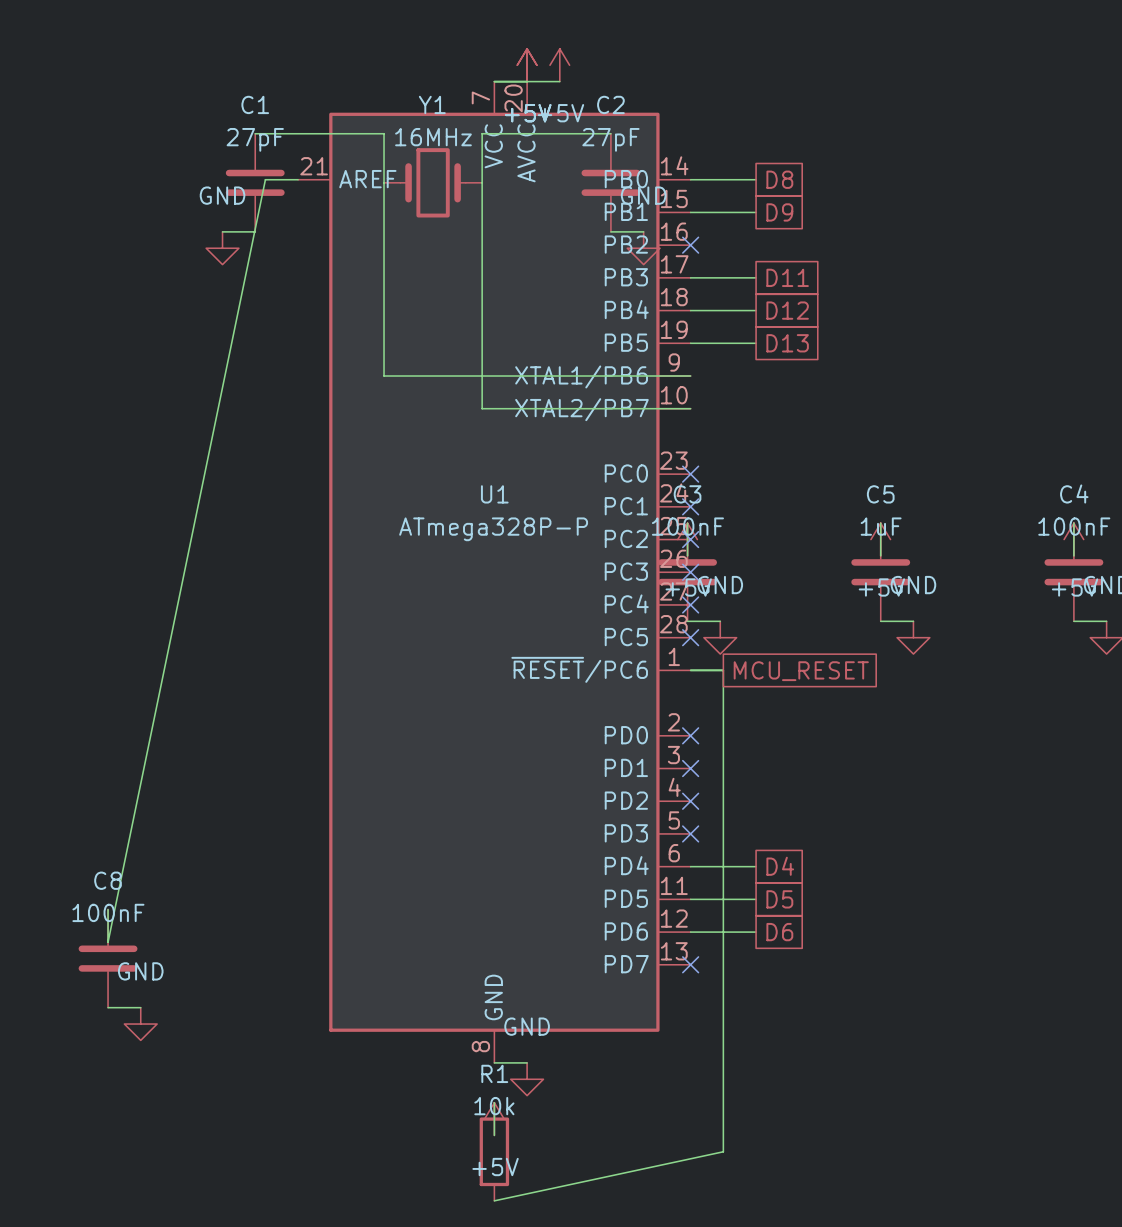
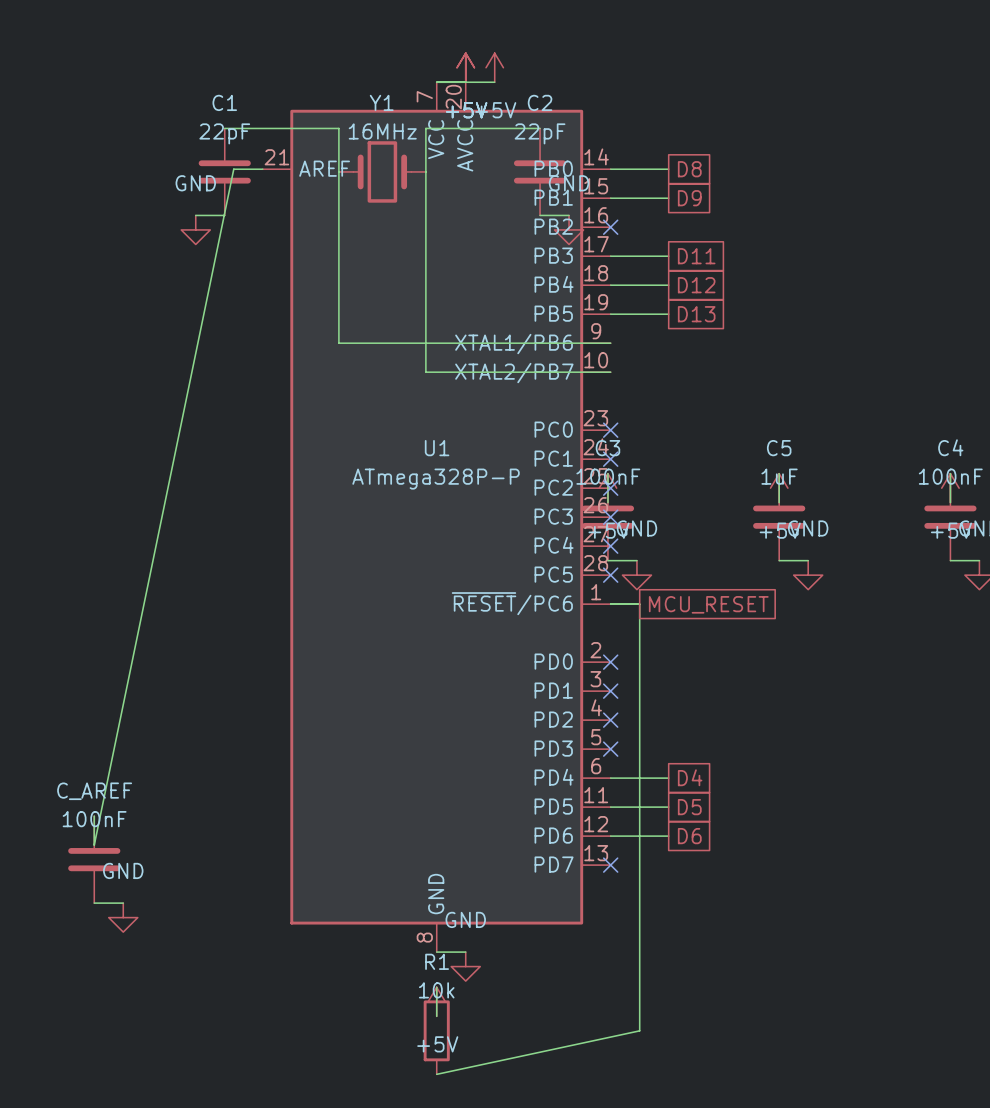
C1 value: 27pF (255, 139) -> 22pF (224, 133)
C2 value: 27pF (610, 139) -> 22pF (540, 133)
C8 name: C8 (108, 880) -> C_AREF (94, 791)

